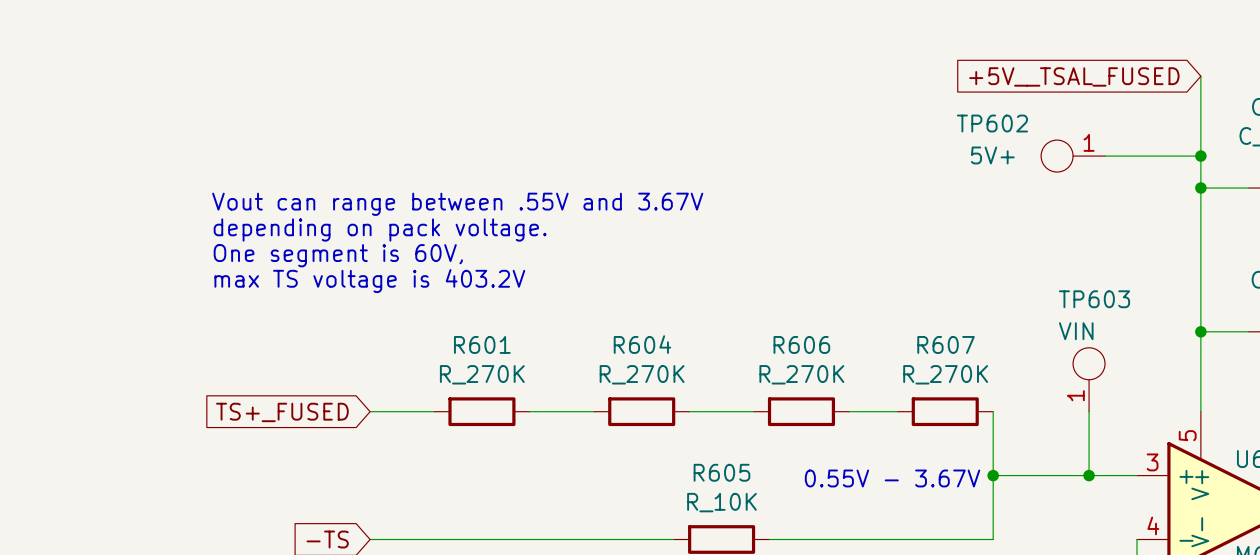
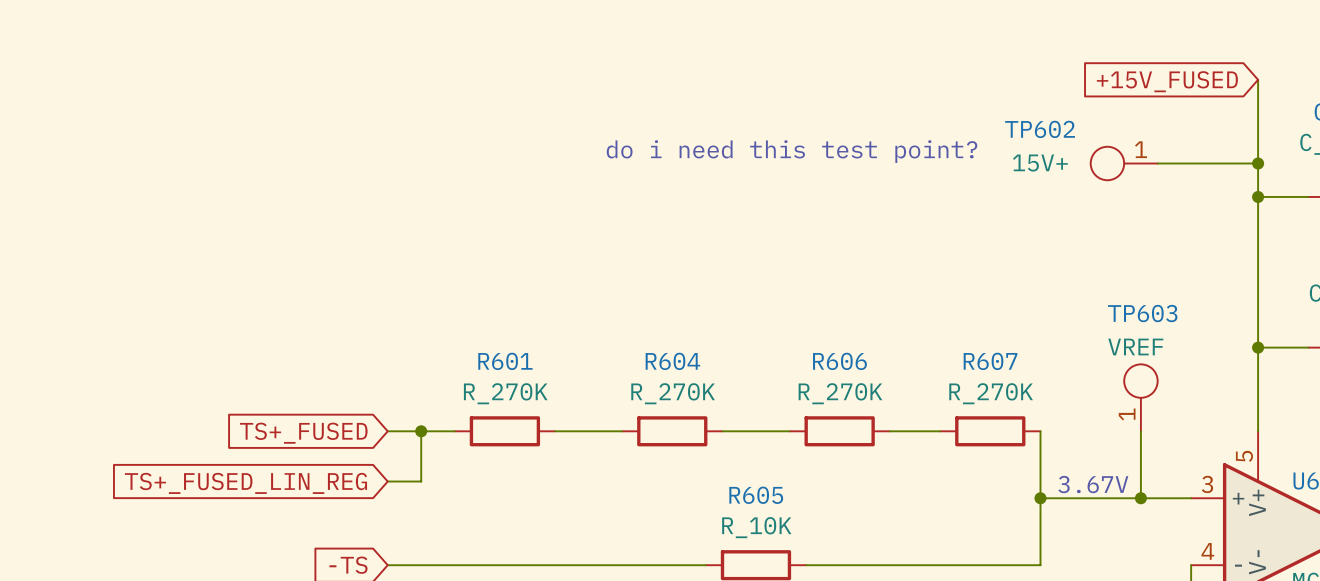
global label: +5V__TSAL_FUSED (1074, 76) -> +15V_FUSED (1167, 81)
text: none -> do i need this test point? (792, 151)
TP602 value: 5V+ (992, 155) -> 15V+ (1040, 163)
text: Vout can range between .55V and 3.67V (457, 204) -> none
text: depending on pack voltage. (380, 230) -> none
text: One segment is 60V, (338, 255) -> none
text: max TS voltage is 403.2V (369, 281) -> none
TP603 value: VIN (1076, 331) -> VREF (1135, 346)
wire: none -> (421, 431) (421, 481) (387, 481)
junction: none -> (421, 431)
global label: none -> TS+_FUSED_LIN_REG (245, 483)
text: none -> 3.67V (1093, 484)
text: 0.55V - 3.67V (892, 478) -> none

